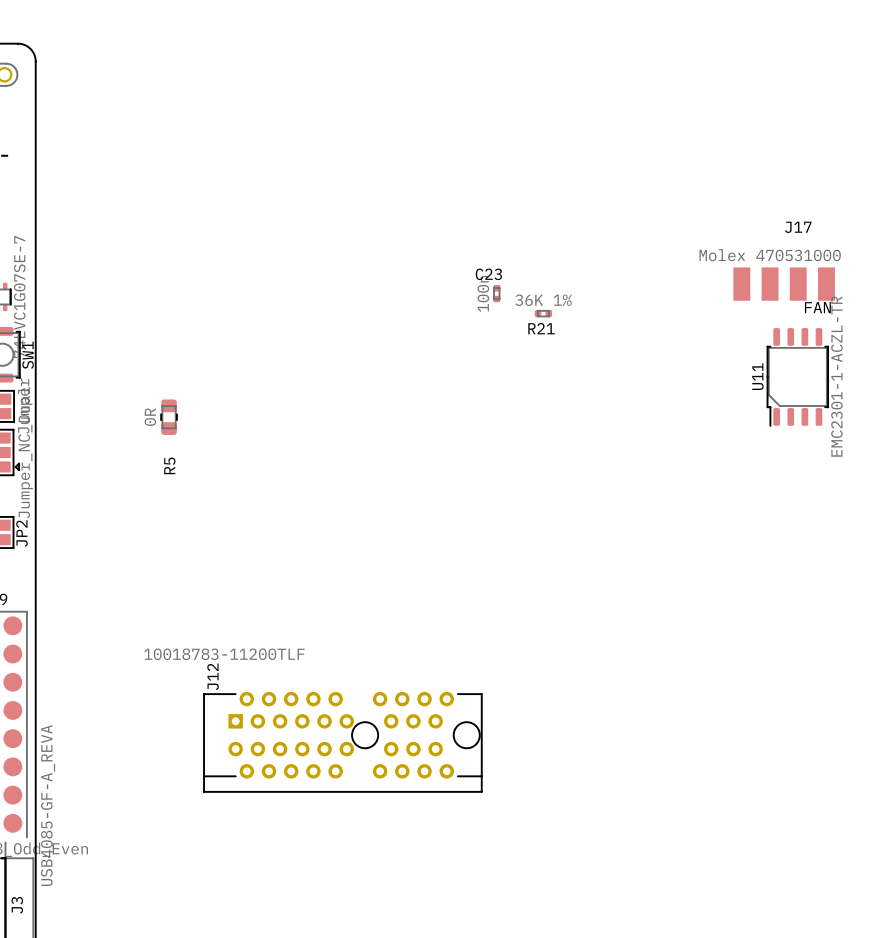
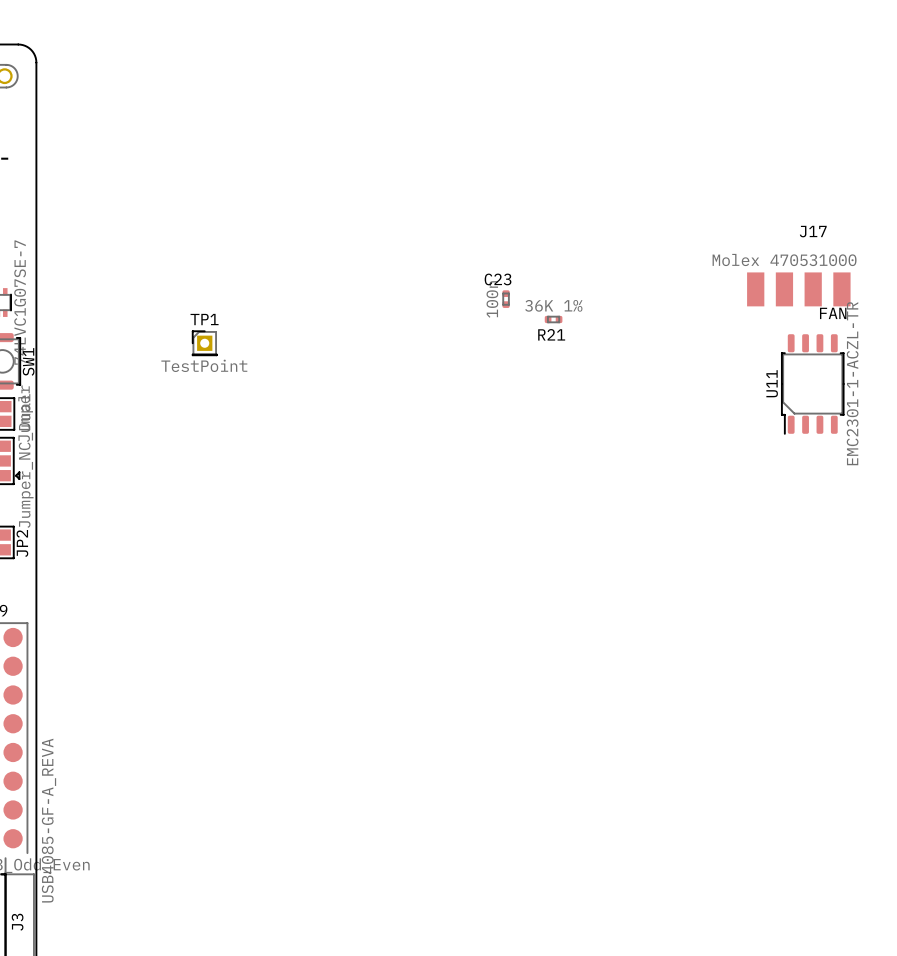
TP1: none -> TestPoint (204, 343)
R5: 0R (169, 417) -> none
J12: 10018783-11200TLF (342, 742) -> none

